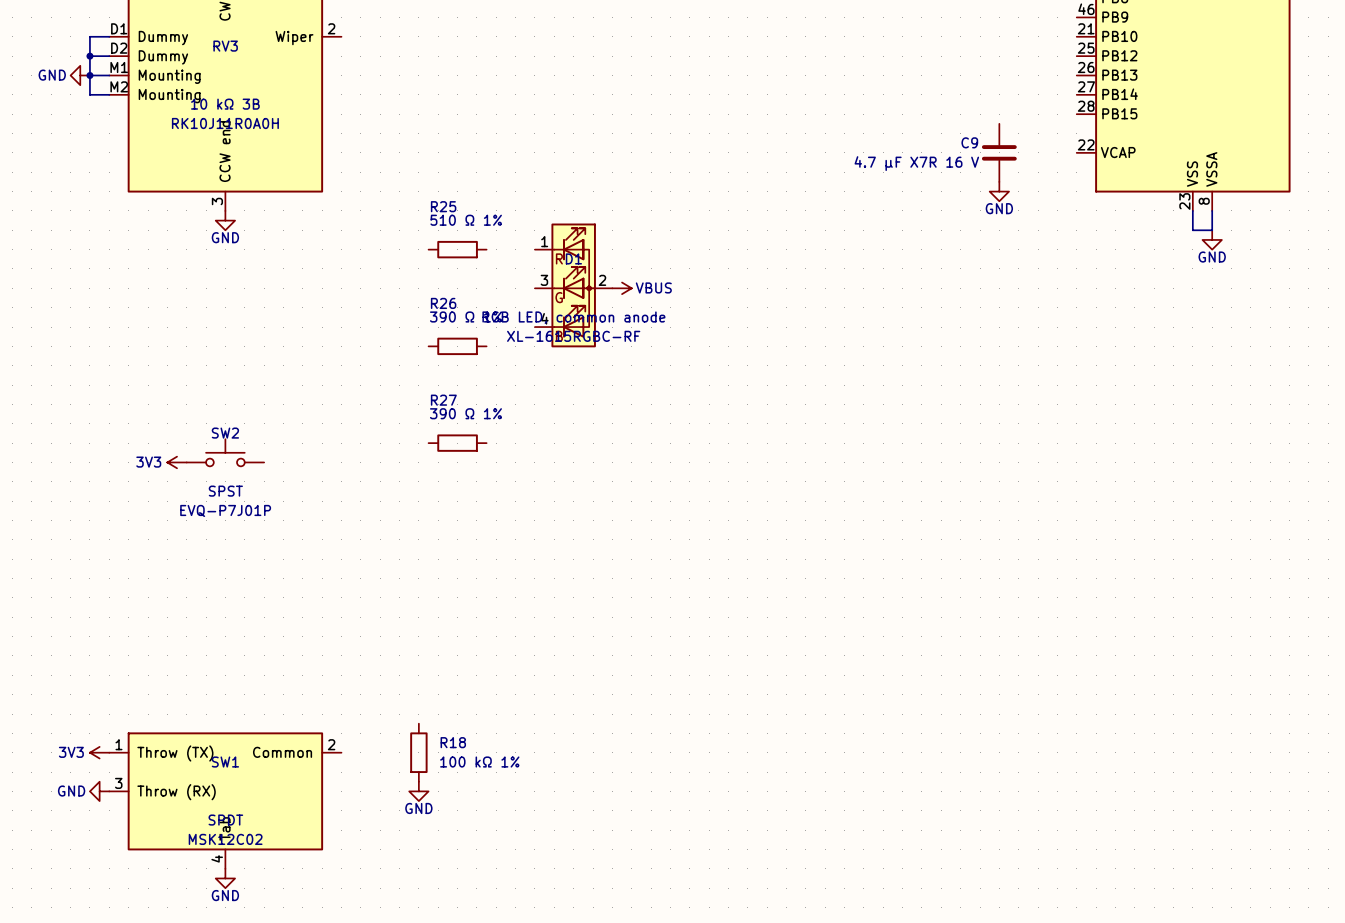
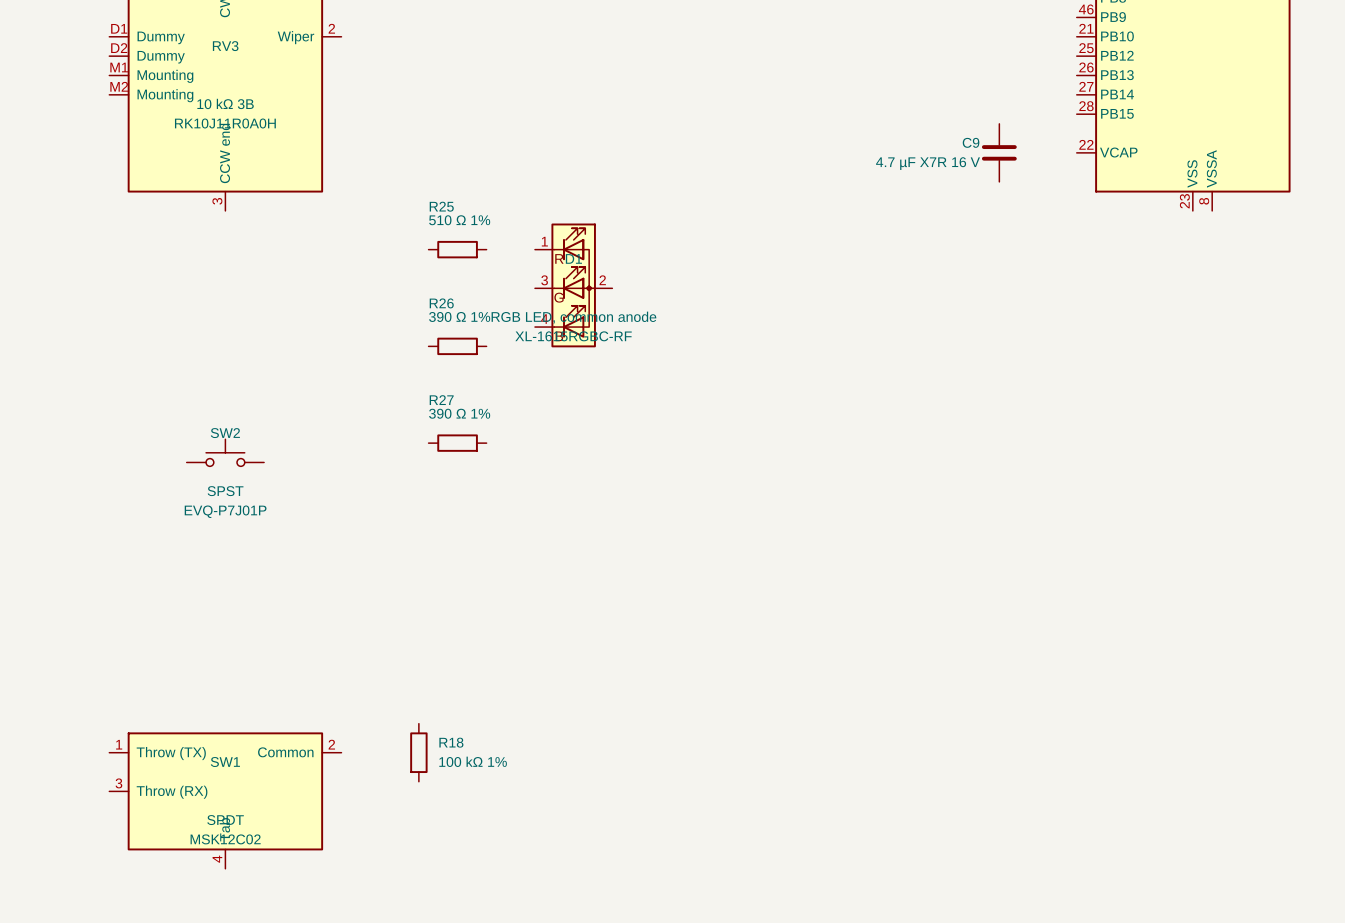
wire: (109, 36) (89, 36) (89, 94) (109, 94) -> none
wire: (89, 56) (109, 56) -> none
junction: (89, 56) -> none
power symbol: GND (80, 75) -> none
wire: (89, 75) (109, 75) -> none
junction: (89, 75) -> none
power symbol: GND (999, 191) -> none
wire: (1192, 210) (1192, 230) (1212, 230) (1212, 210) -> none
power symbol: GND (225, 220) -> none
power symbol: GND (1212, 239) -> none
power symbol: VBUS (622, 288) -> none
power symbol: 3V3 (177, 462) -> none
power symbol: 3V3 (99, 752) -> none
power symbol: GND (99, 791) -> none
power symbol: GND (418, 791) -> none
power symbol: GND (225, 878) -> none

